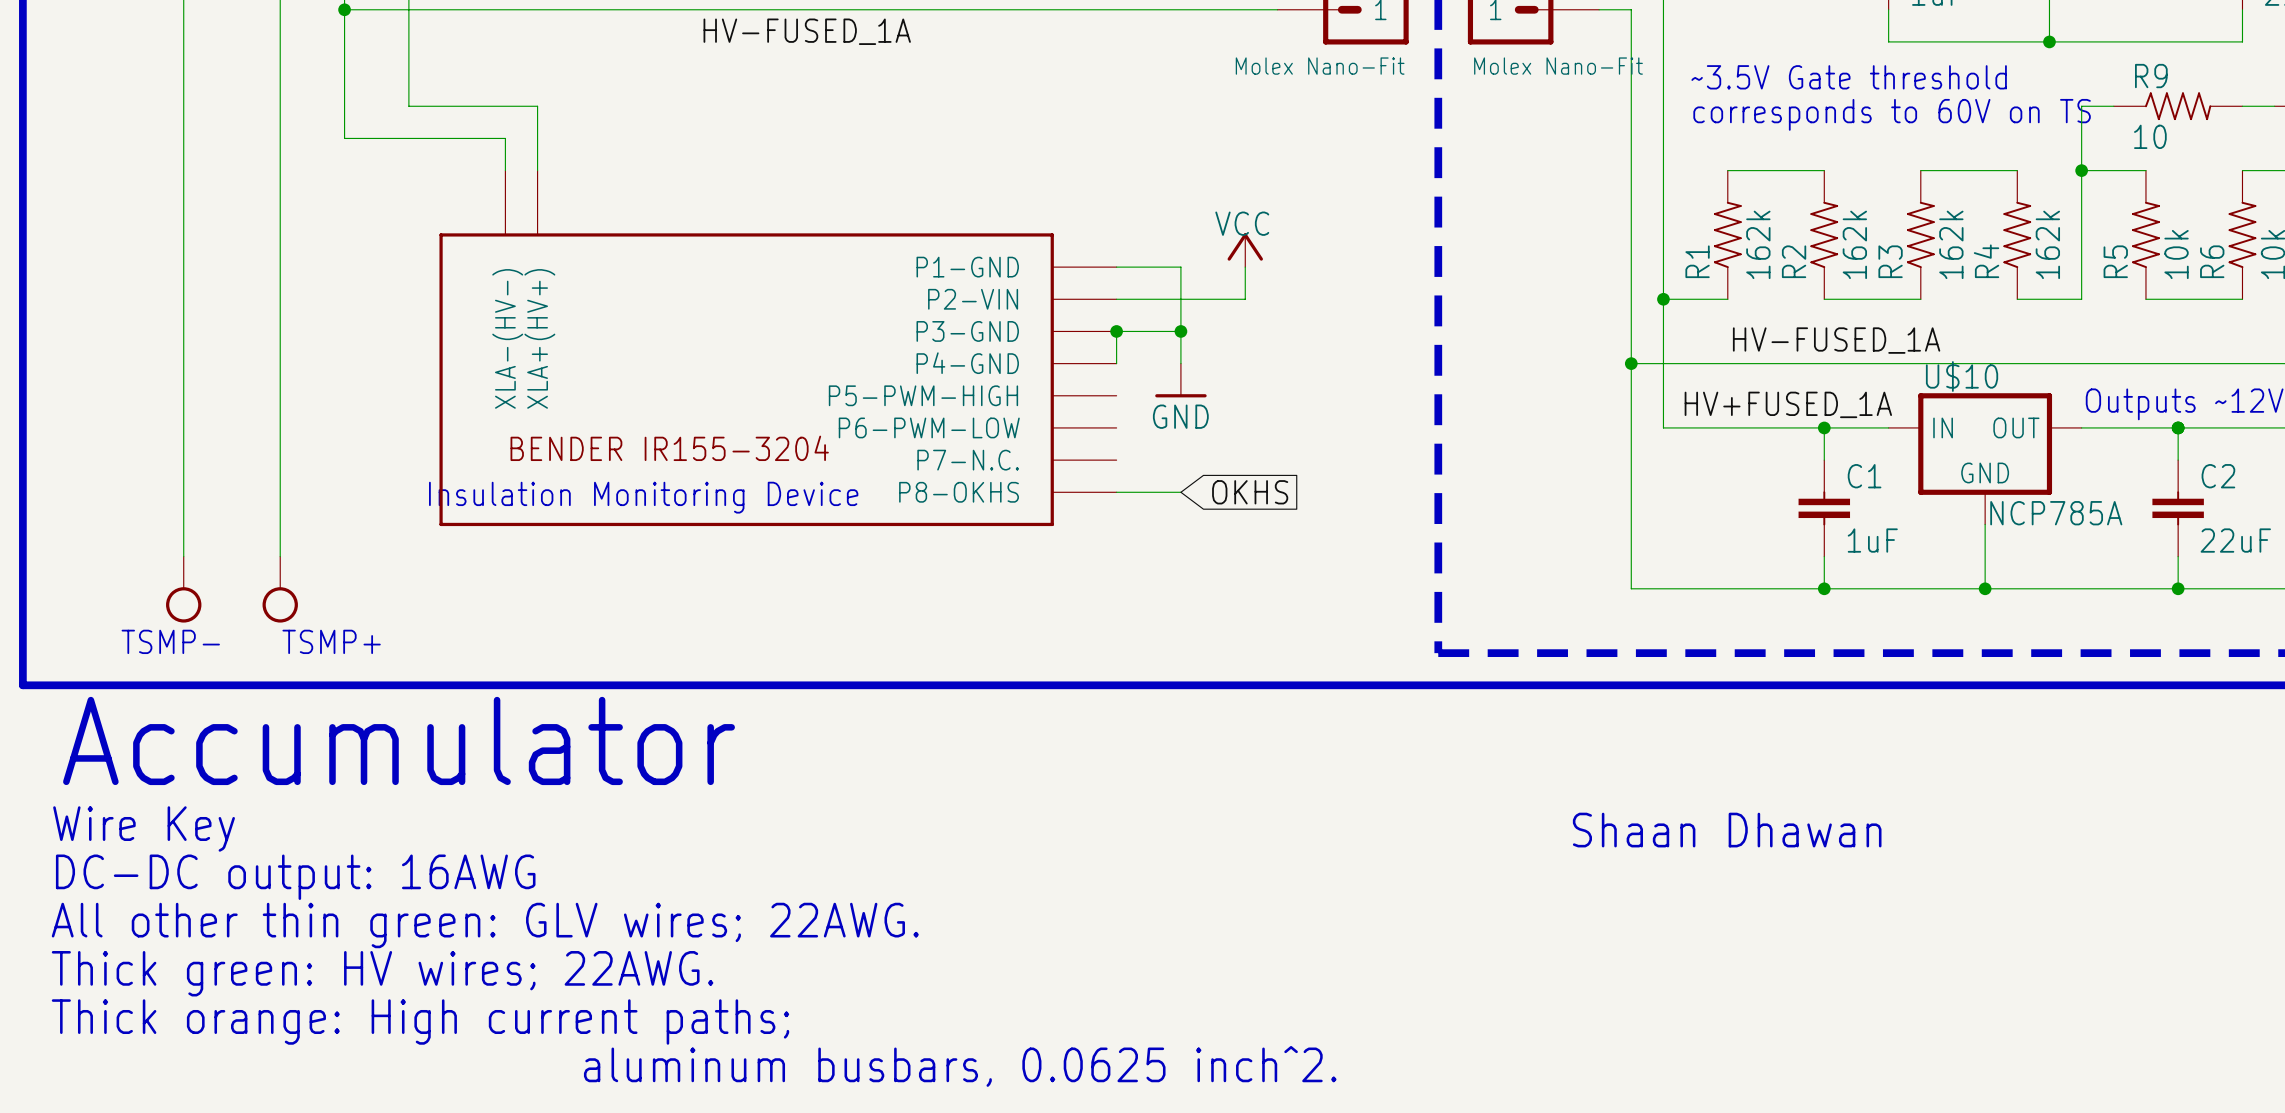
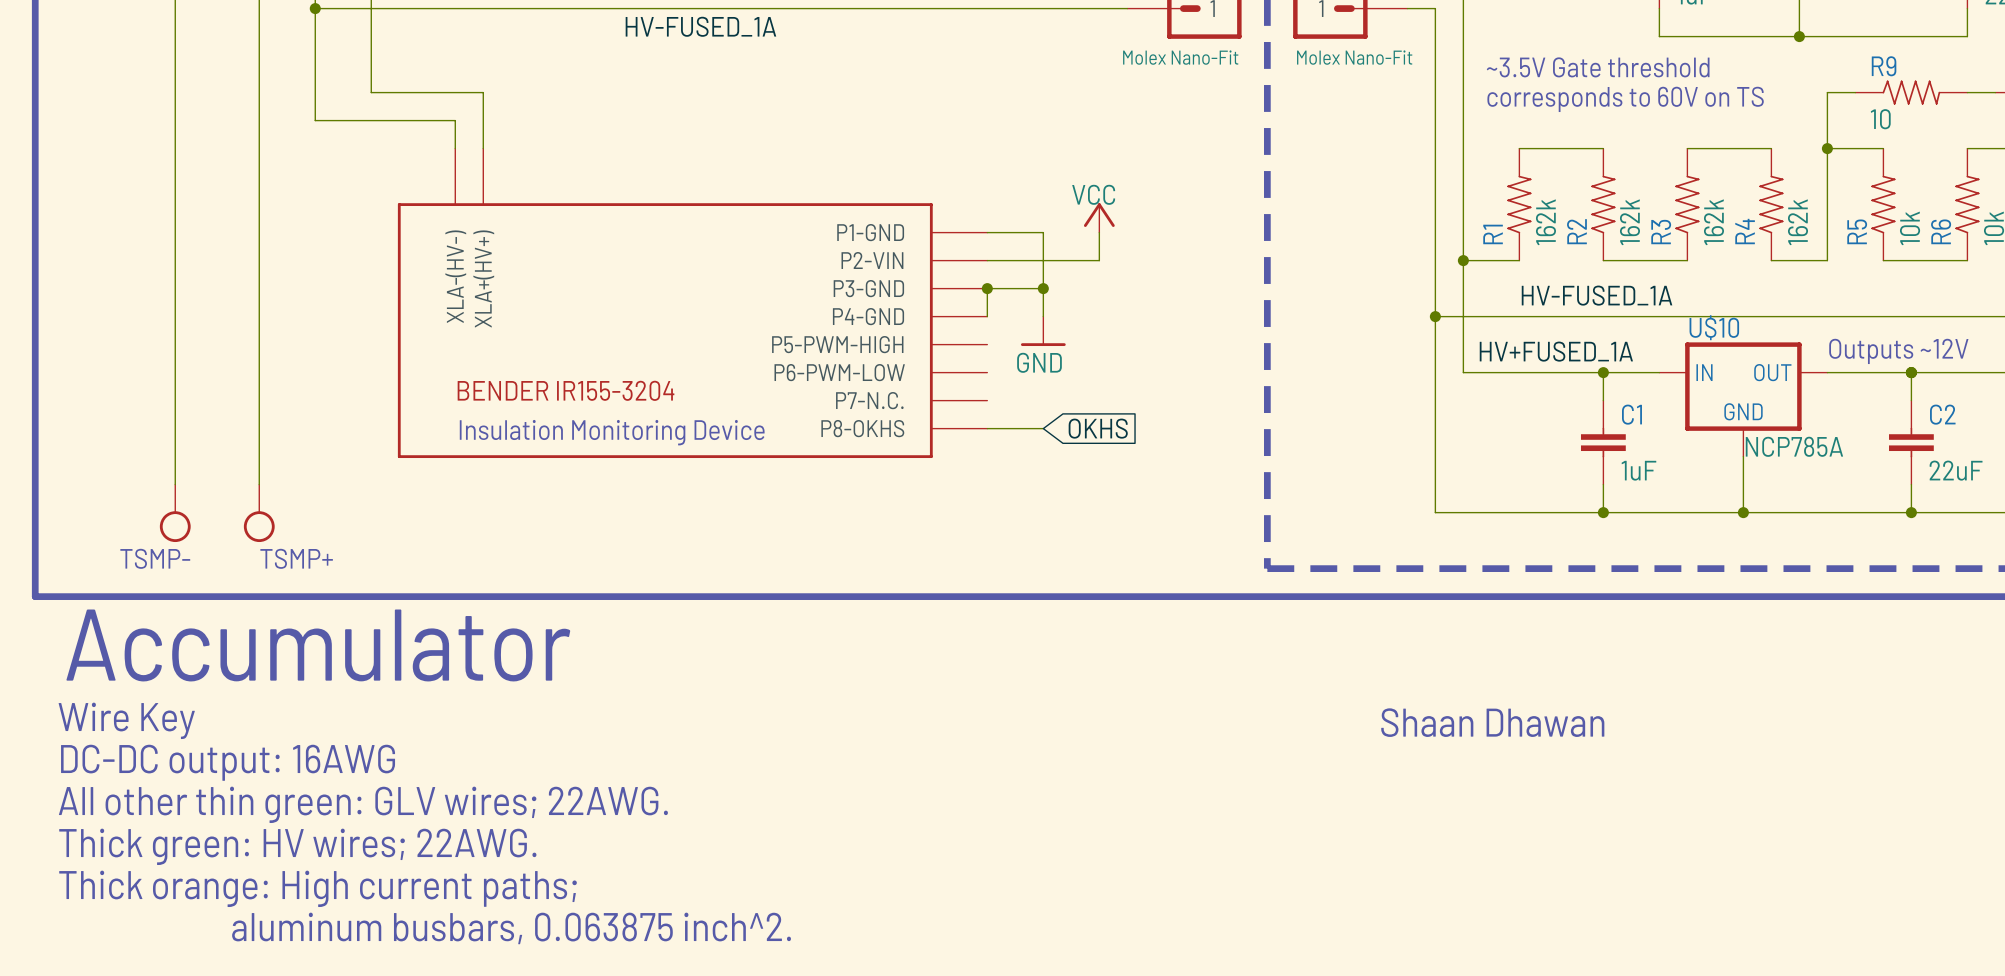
text: aluminum busbars, 0.0625 inch^2. (960, 1066) -> aluminum busbars, 0.063875 inch^2. (511, 928)

